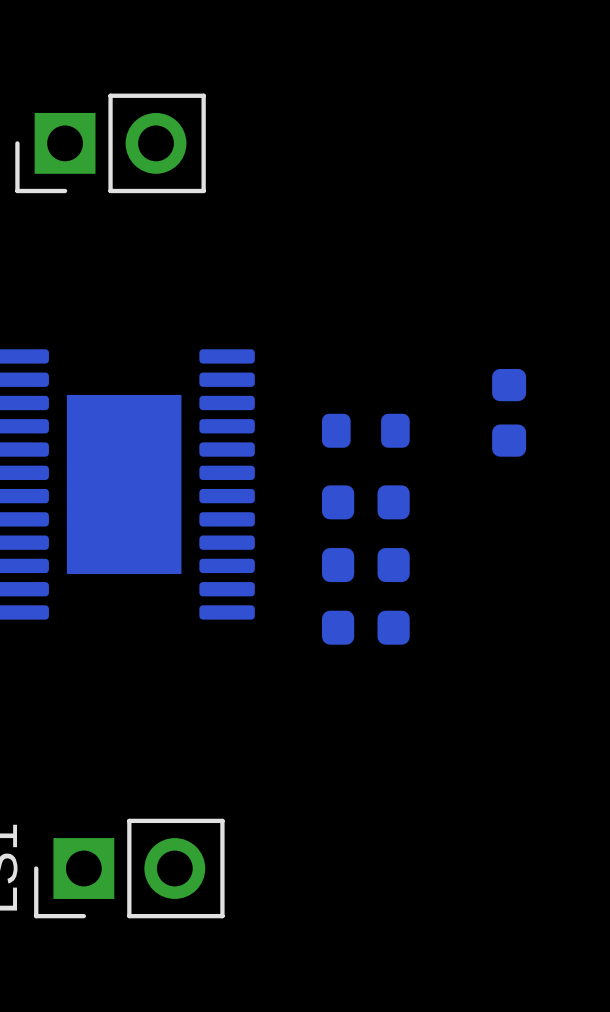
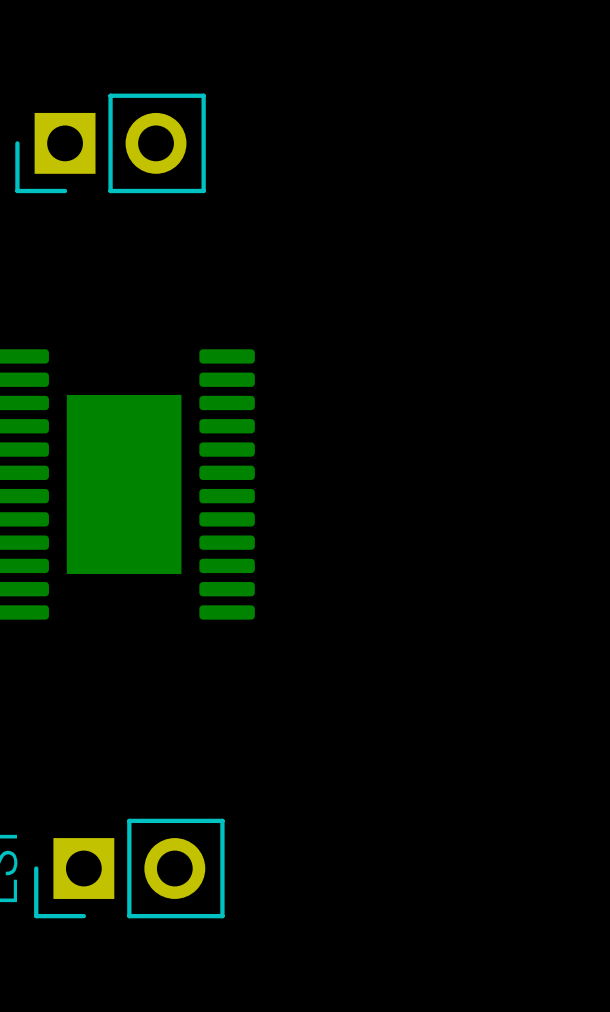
part: (509, 412) -> none
part: (365, 430) -> none
part: (365, 502) -> none
part: (365, 565) -> none
part: (365, 627) -> none

